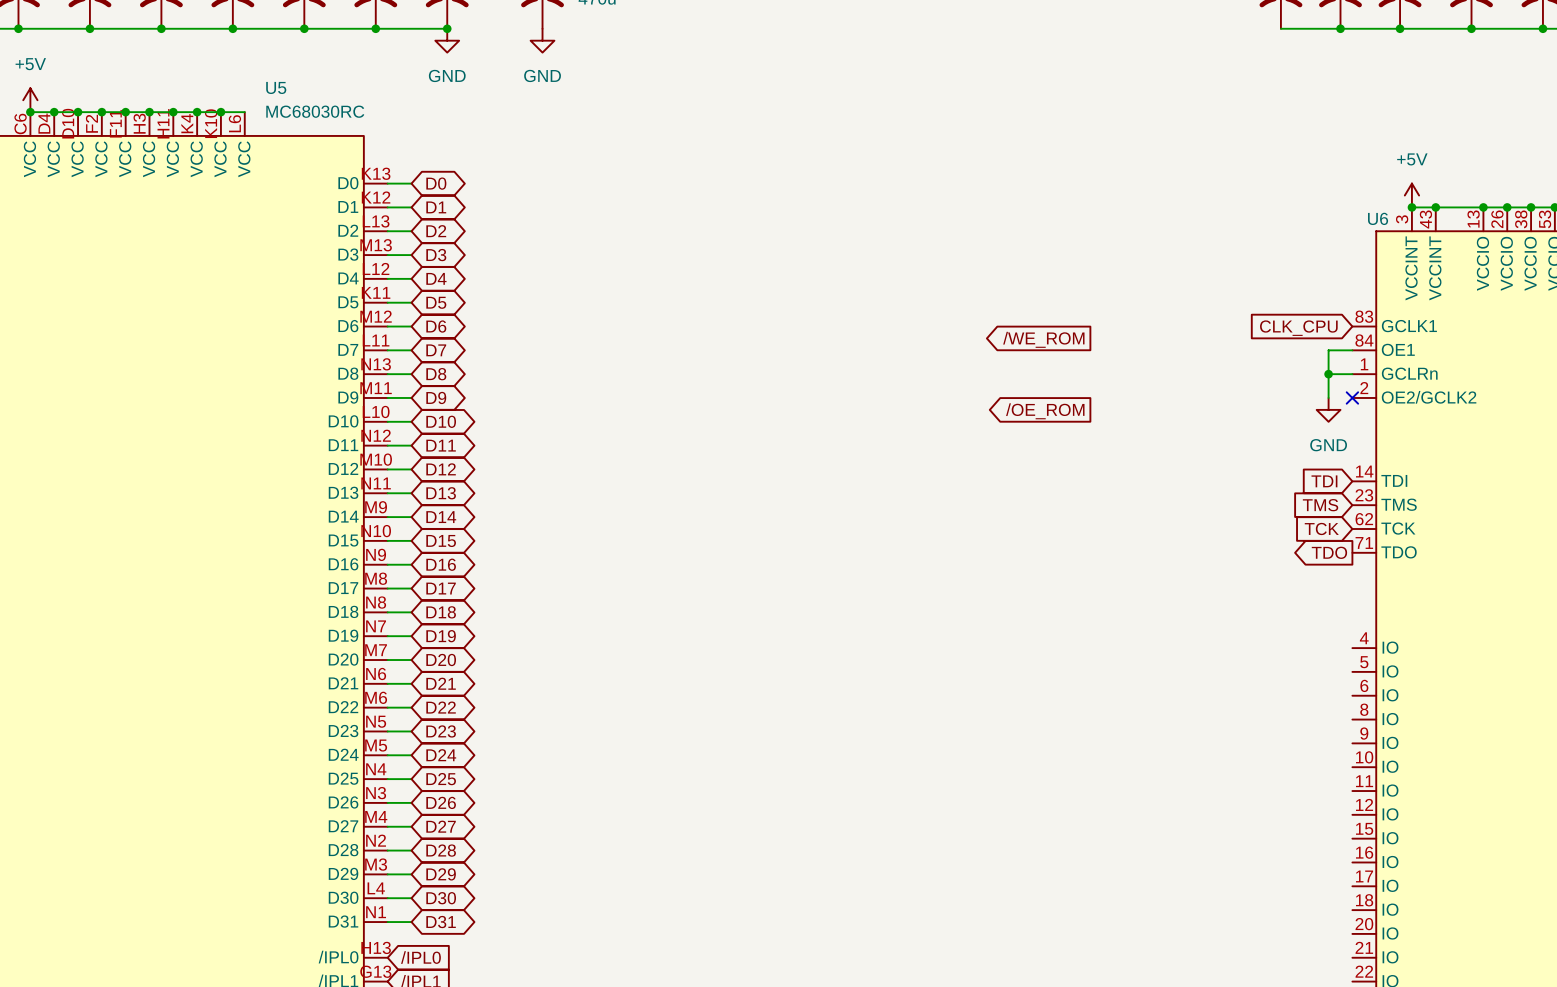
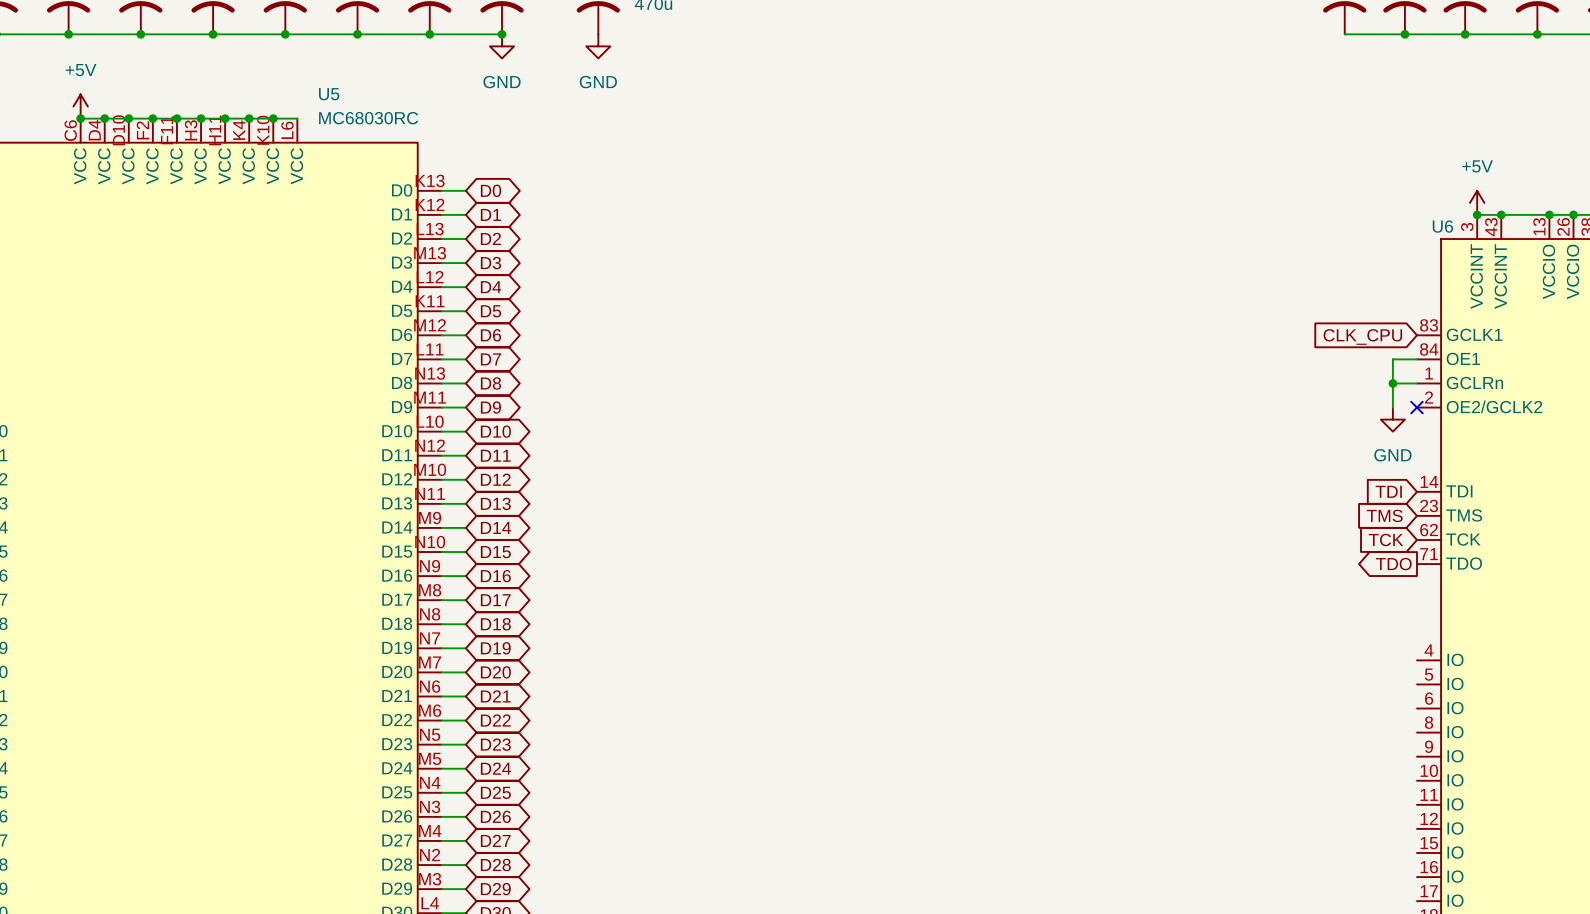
global label: /WE_ROM (1043, 339) -> none
global label: /OE_ROM (1045, 411) -> none

